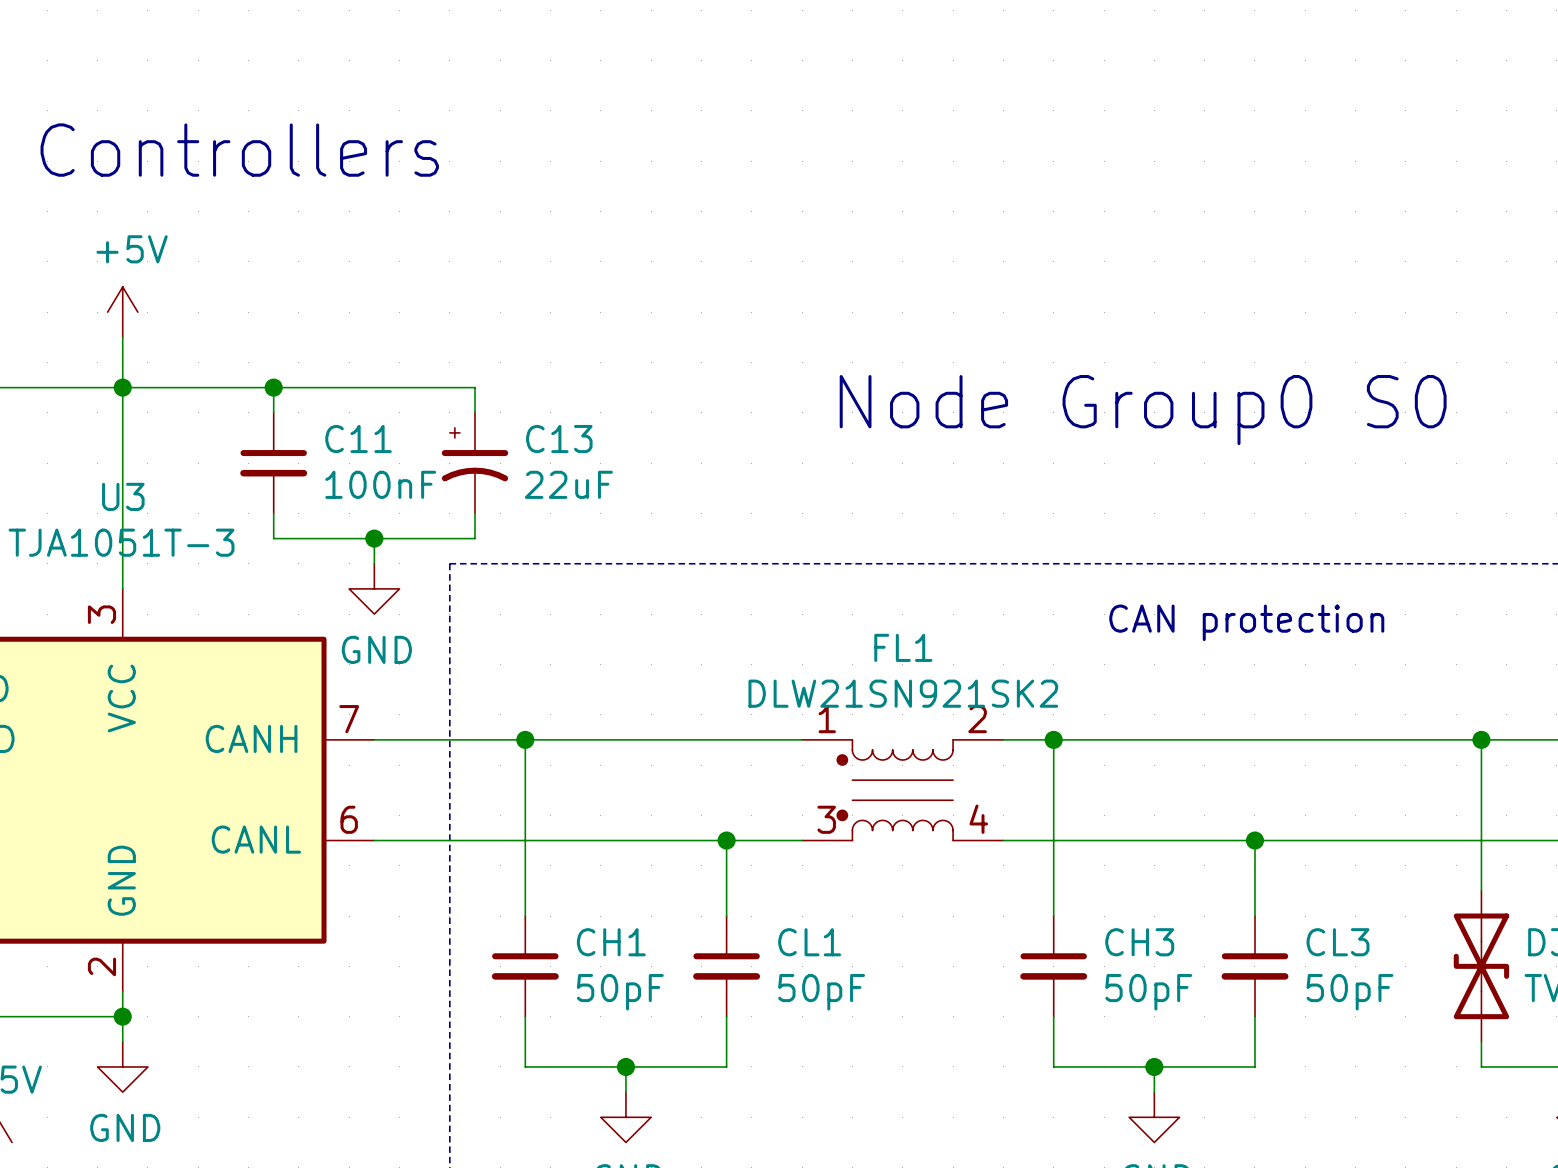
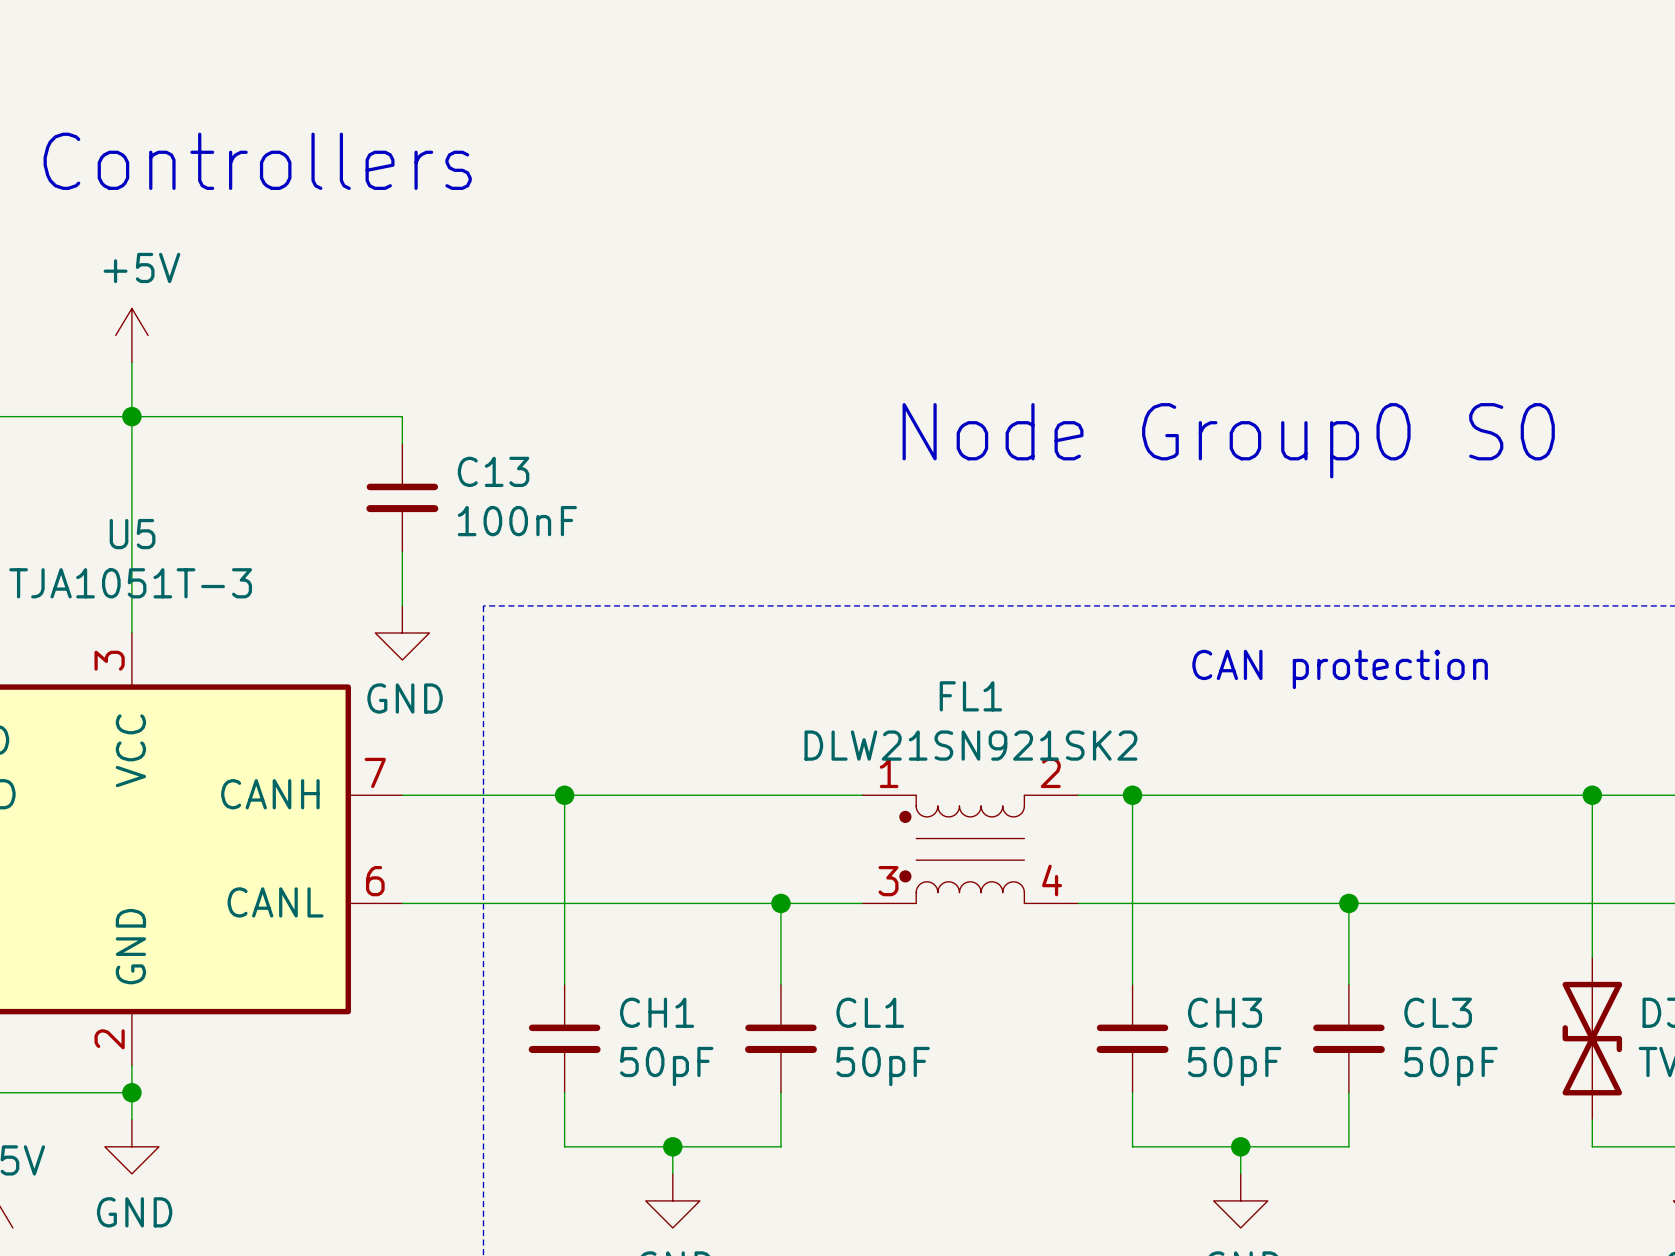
wire: (273, 387) (273, 412) -> (402, 551) (402, 578)
junction: (273, 387) -> none
wire: (374, 387) (474, 387) (474, 412) -> (402, 416) (402, 443)
C13 symbol: [441, 412, 509, 514] -> [366, 443, 439, 552]
C11: 100nF (273, 463) -> none
C13 value: 22uF (568, 484) -> 100nF (517, 521)
U3 name: U3 (123, 496) -> U5 (132, 534)
wire: (273, 513) (273, 538) (474, 538) (474, 513) -> none
junction: (374, 538) -> none

